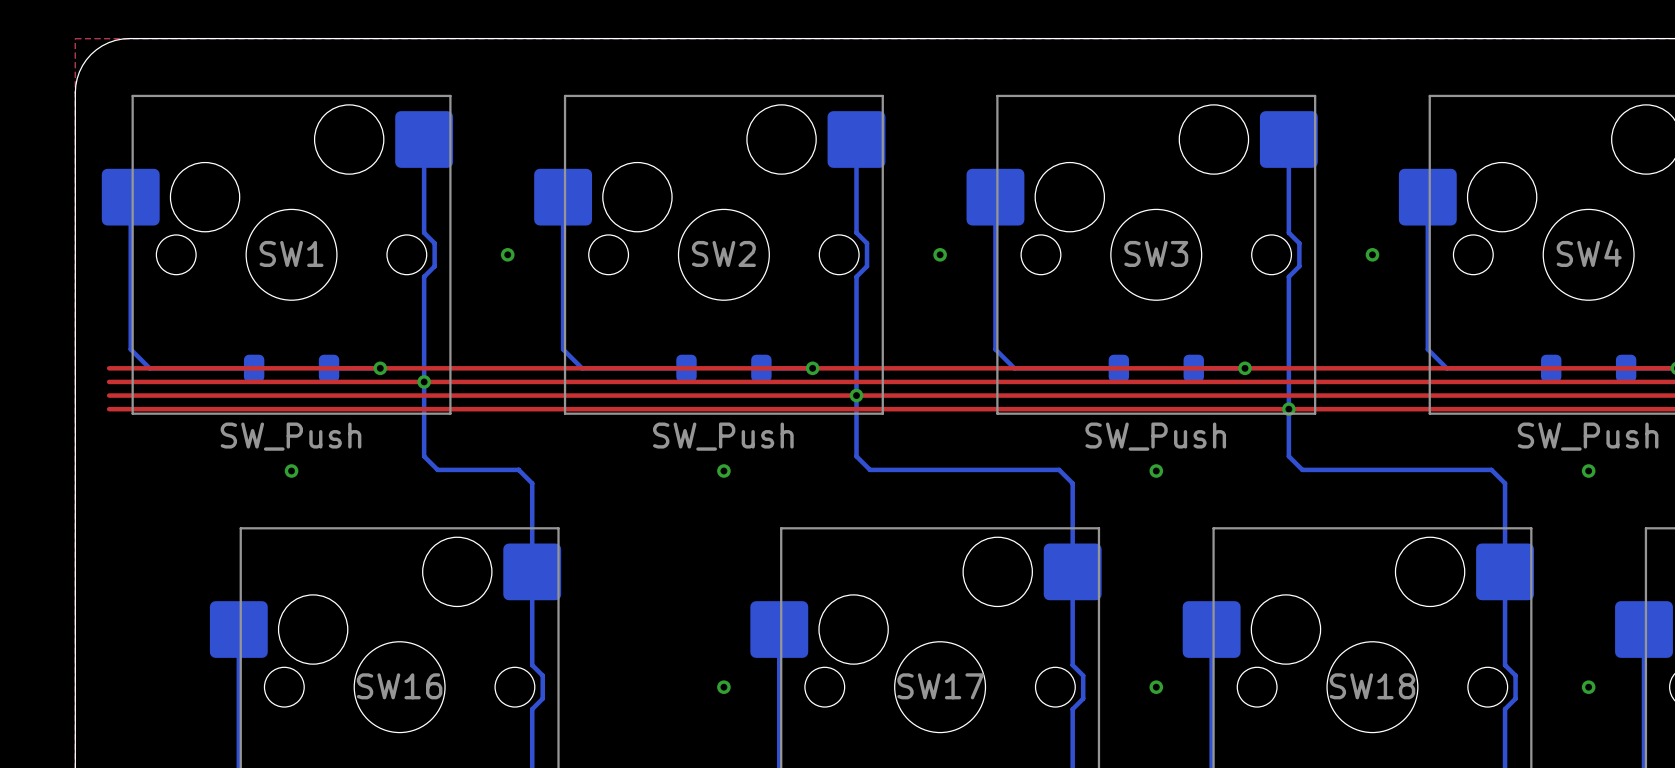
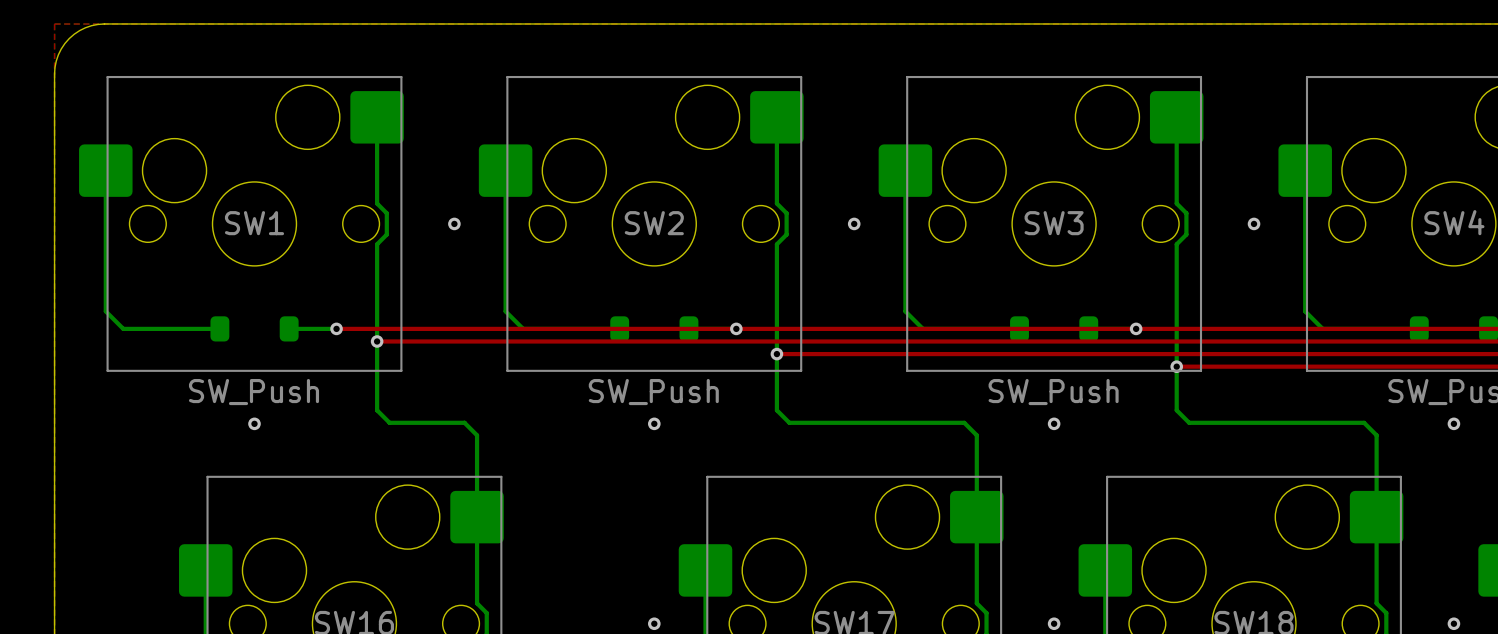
top track: (109, 368) (380, 368) -> none
top track: (109, 381) (424, 381) -> none
top track: (109, 395) (856, 395) -> none
top track: (109, 409) (1288, 409) -> none

